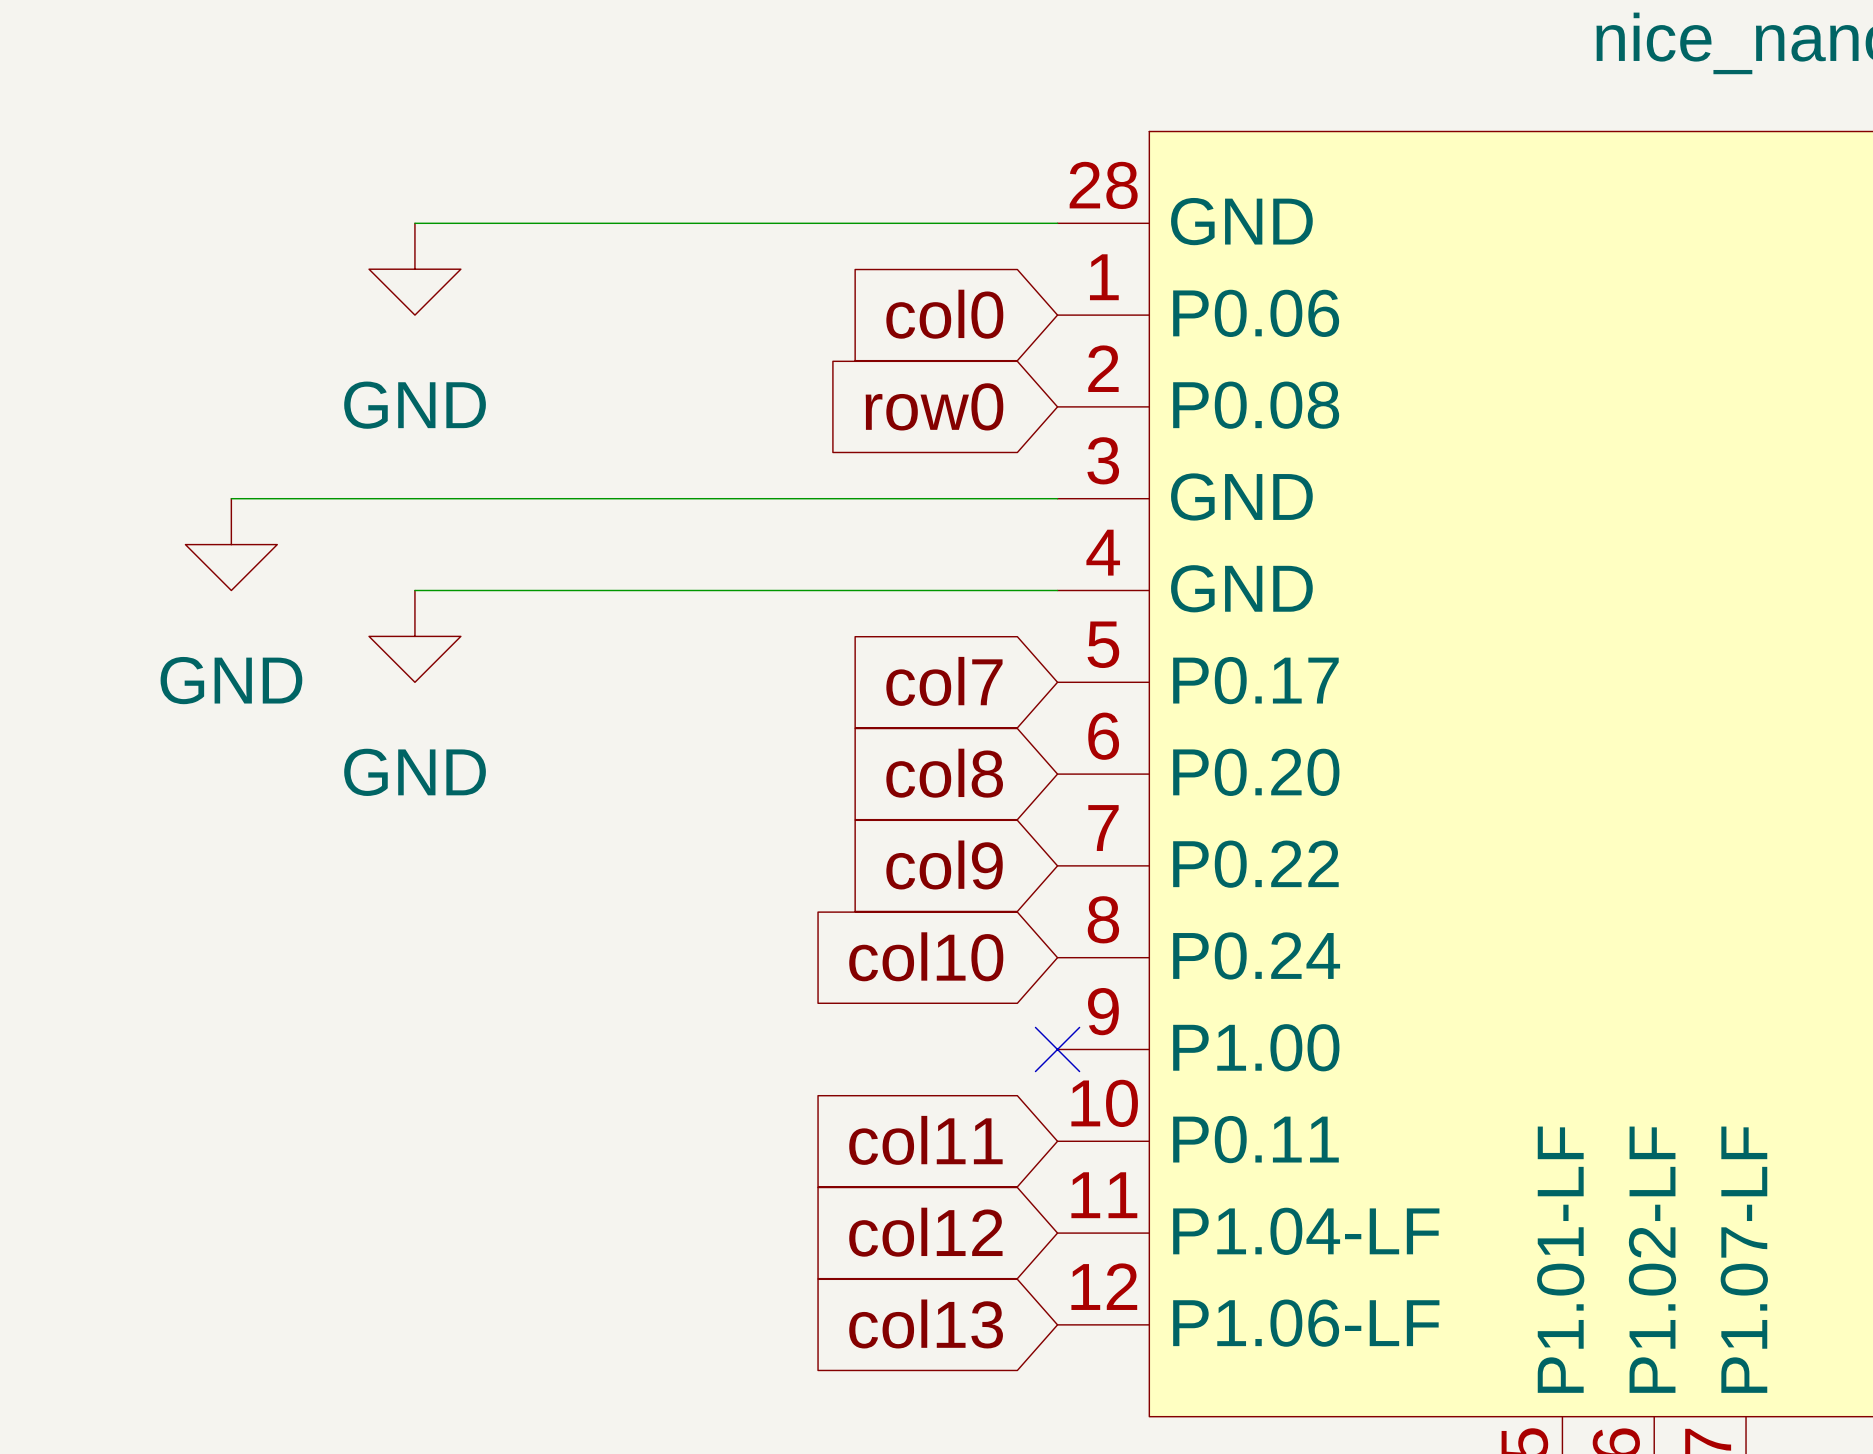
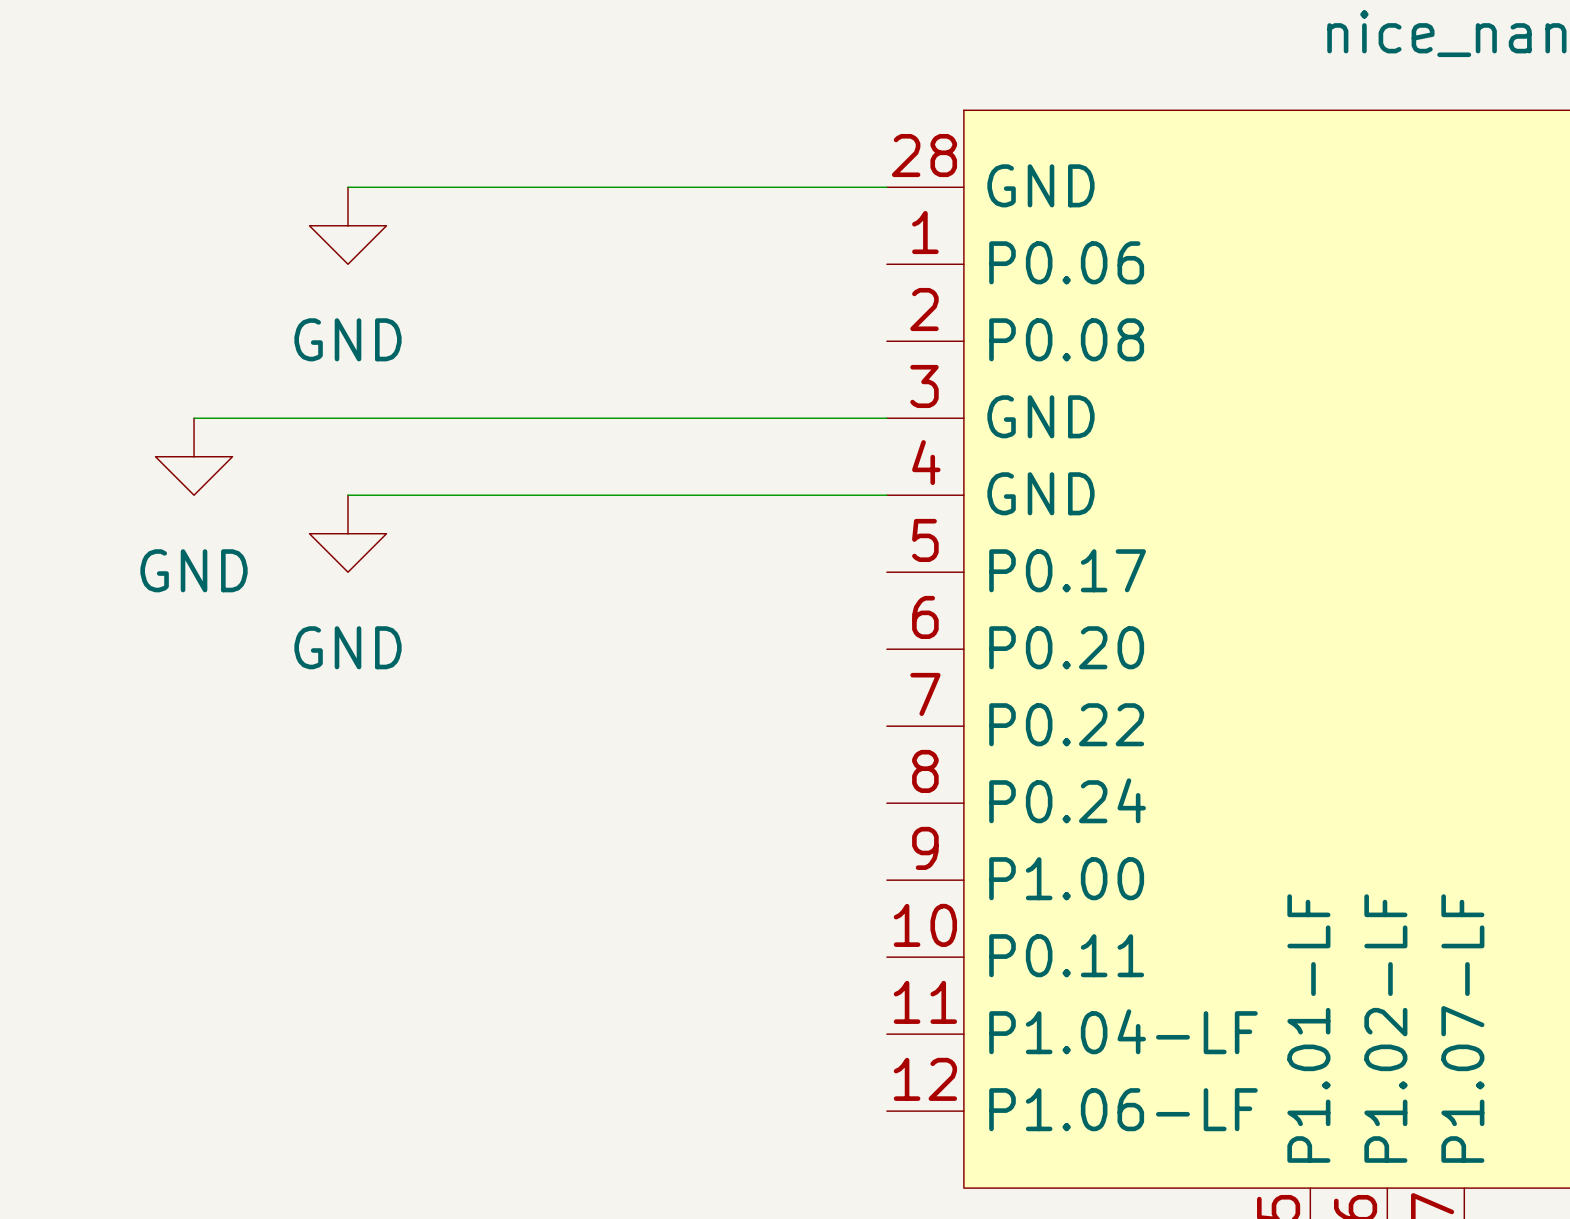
global label: col0 (944, 314) -> none
global label: row0 (934, 406) -> none
global label: col7 (944, 681) -> none
global label: col8 (944, 773) -> none
global label: col9 (944, 864) -> none
global label: col10 (926, 956) -> none
no-connect mark: (1057, 1049) -> none
global label: col11 (925, 1140) -> none
global label: col12 (925, 1232) -> none
global label: col13 (926, 1323) -> none

